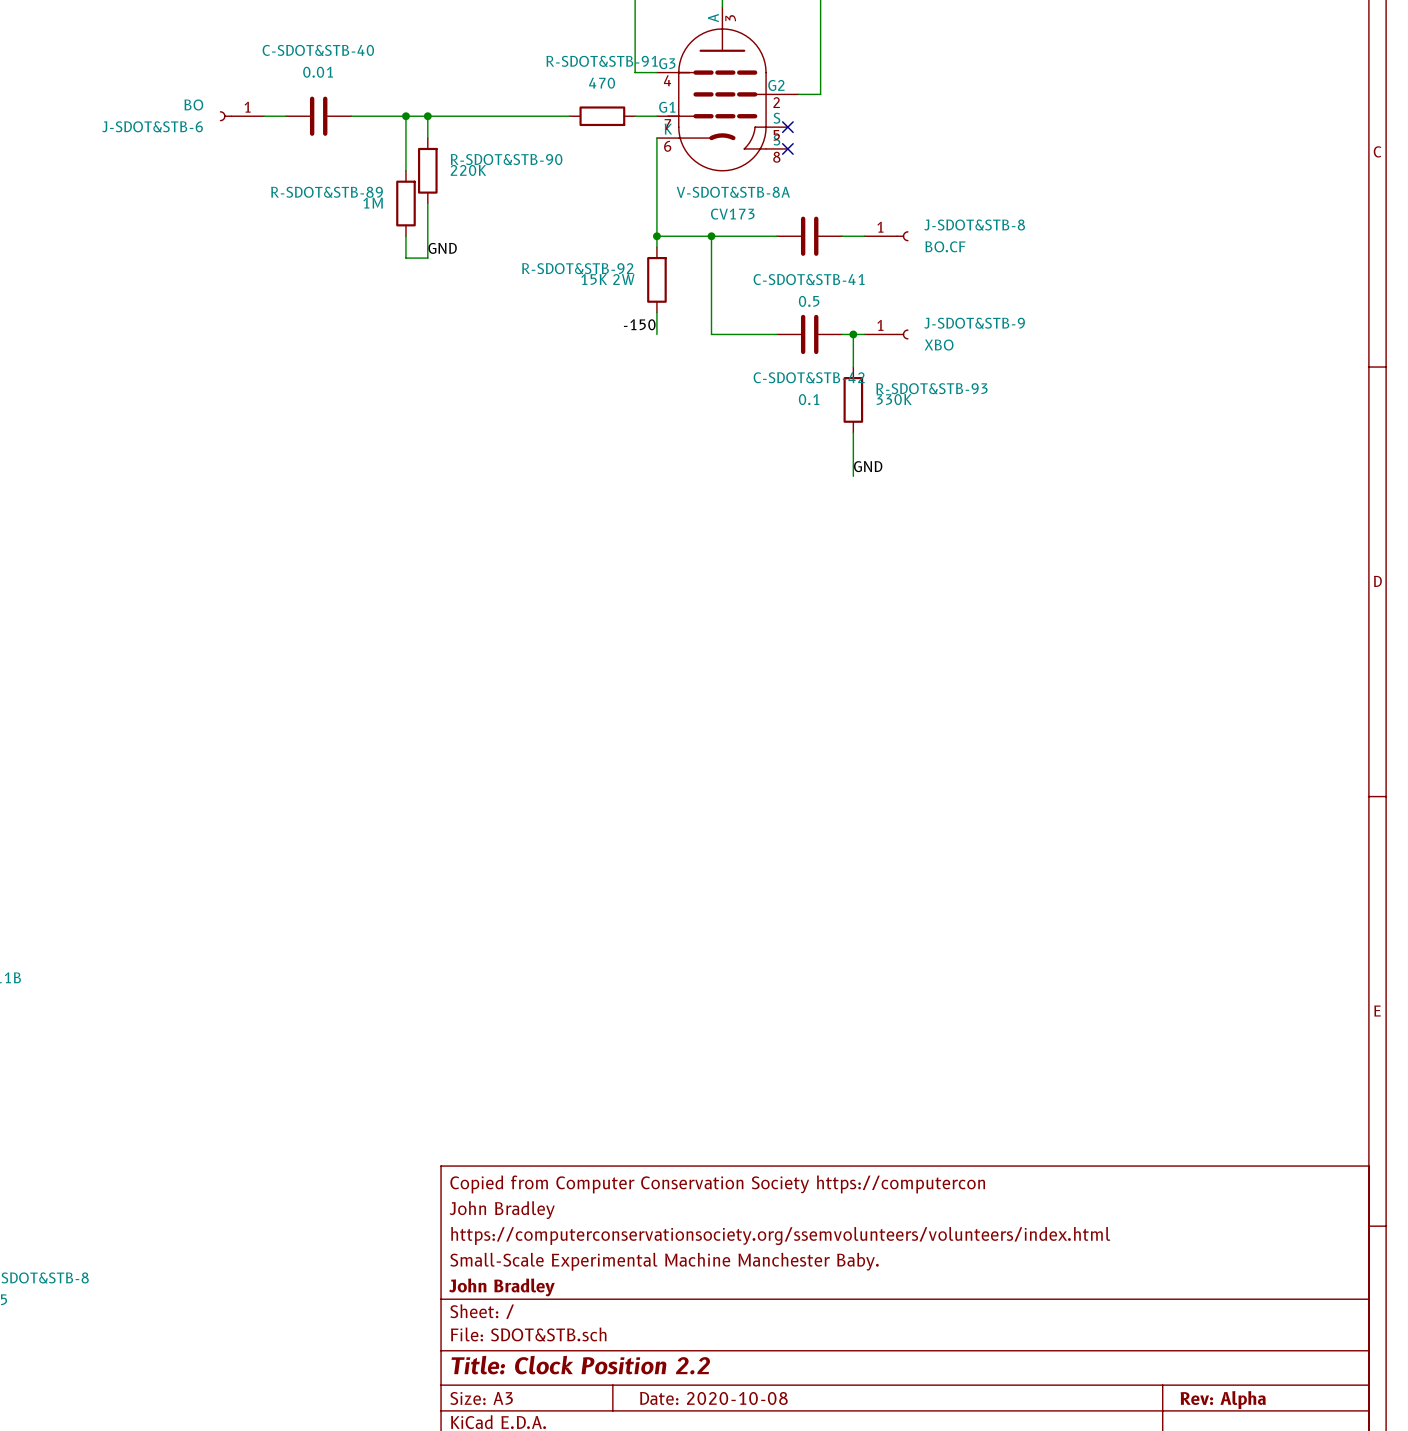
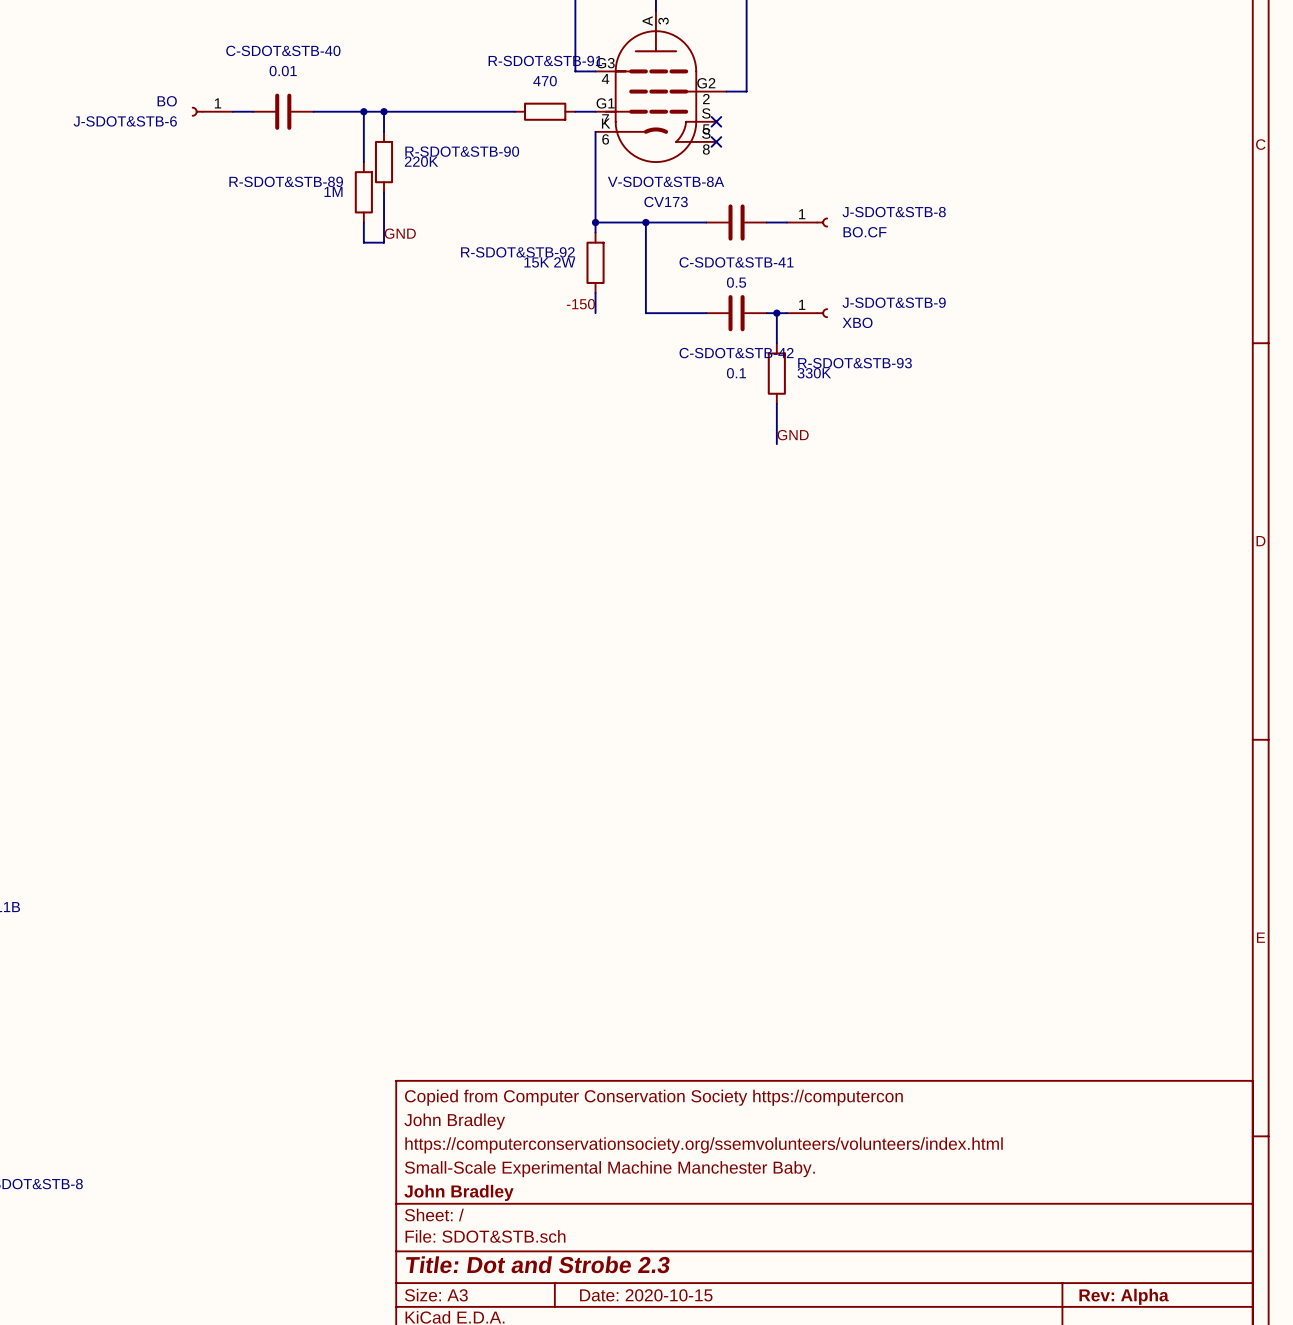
title block: Title: Clock Position 2.2 (580, 1365) -> Title: Dot and Strobe 2.3 (537, 1264)
title block: Date: 2020-10-08 (713, 1398) -> Date: 2020-10-15 (646, 1295)

